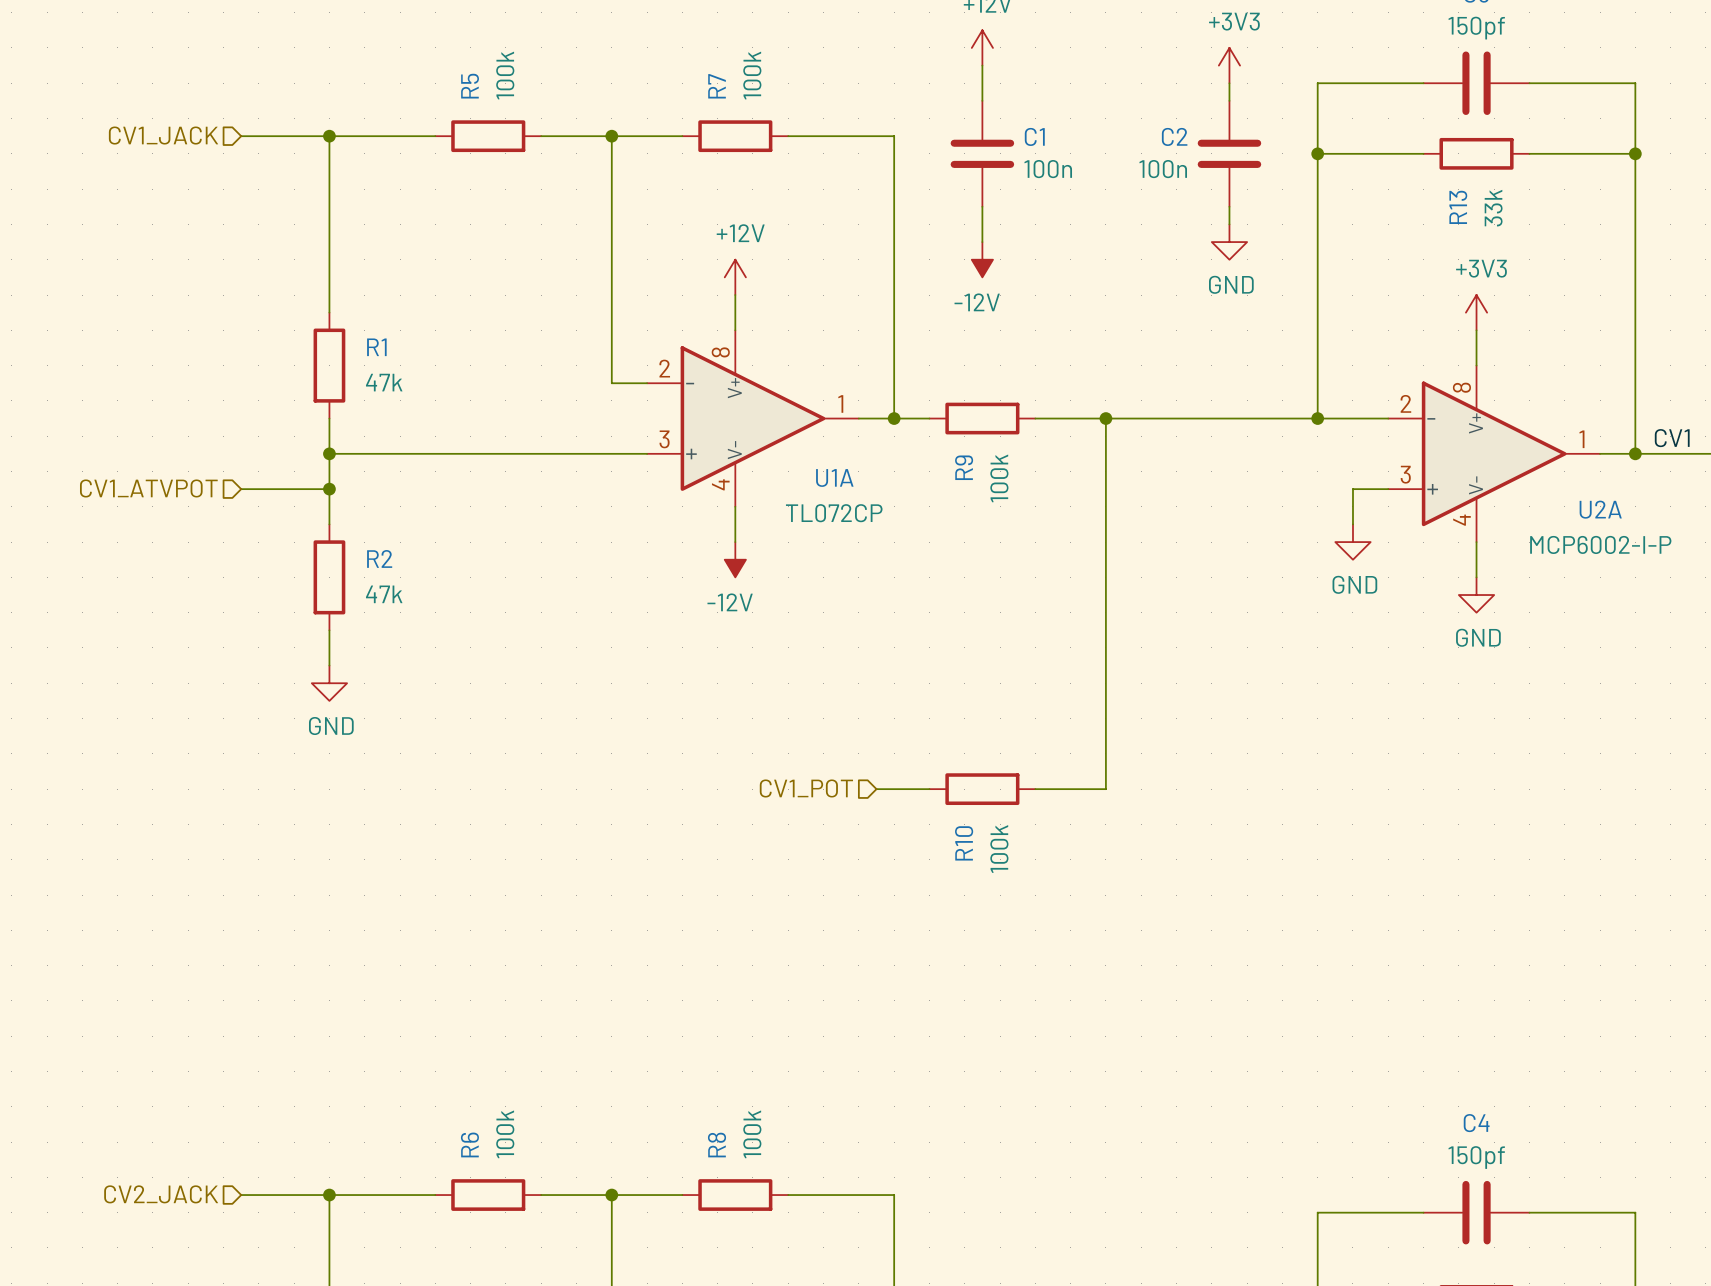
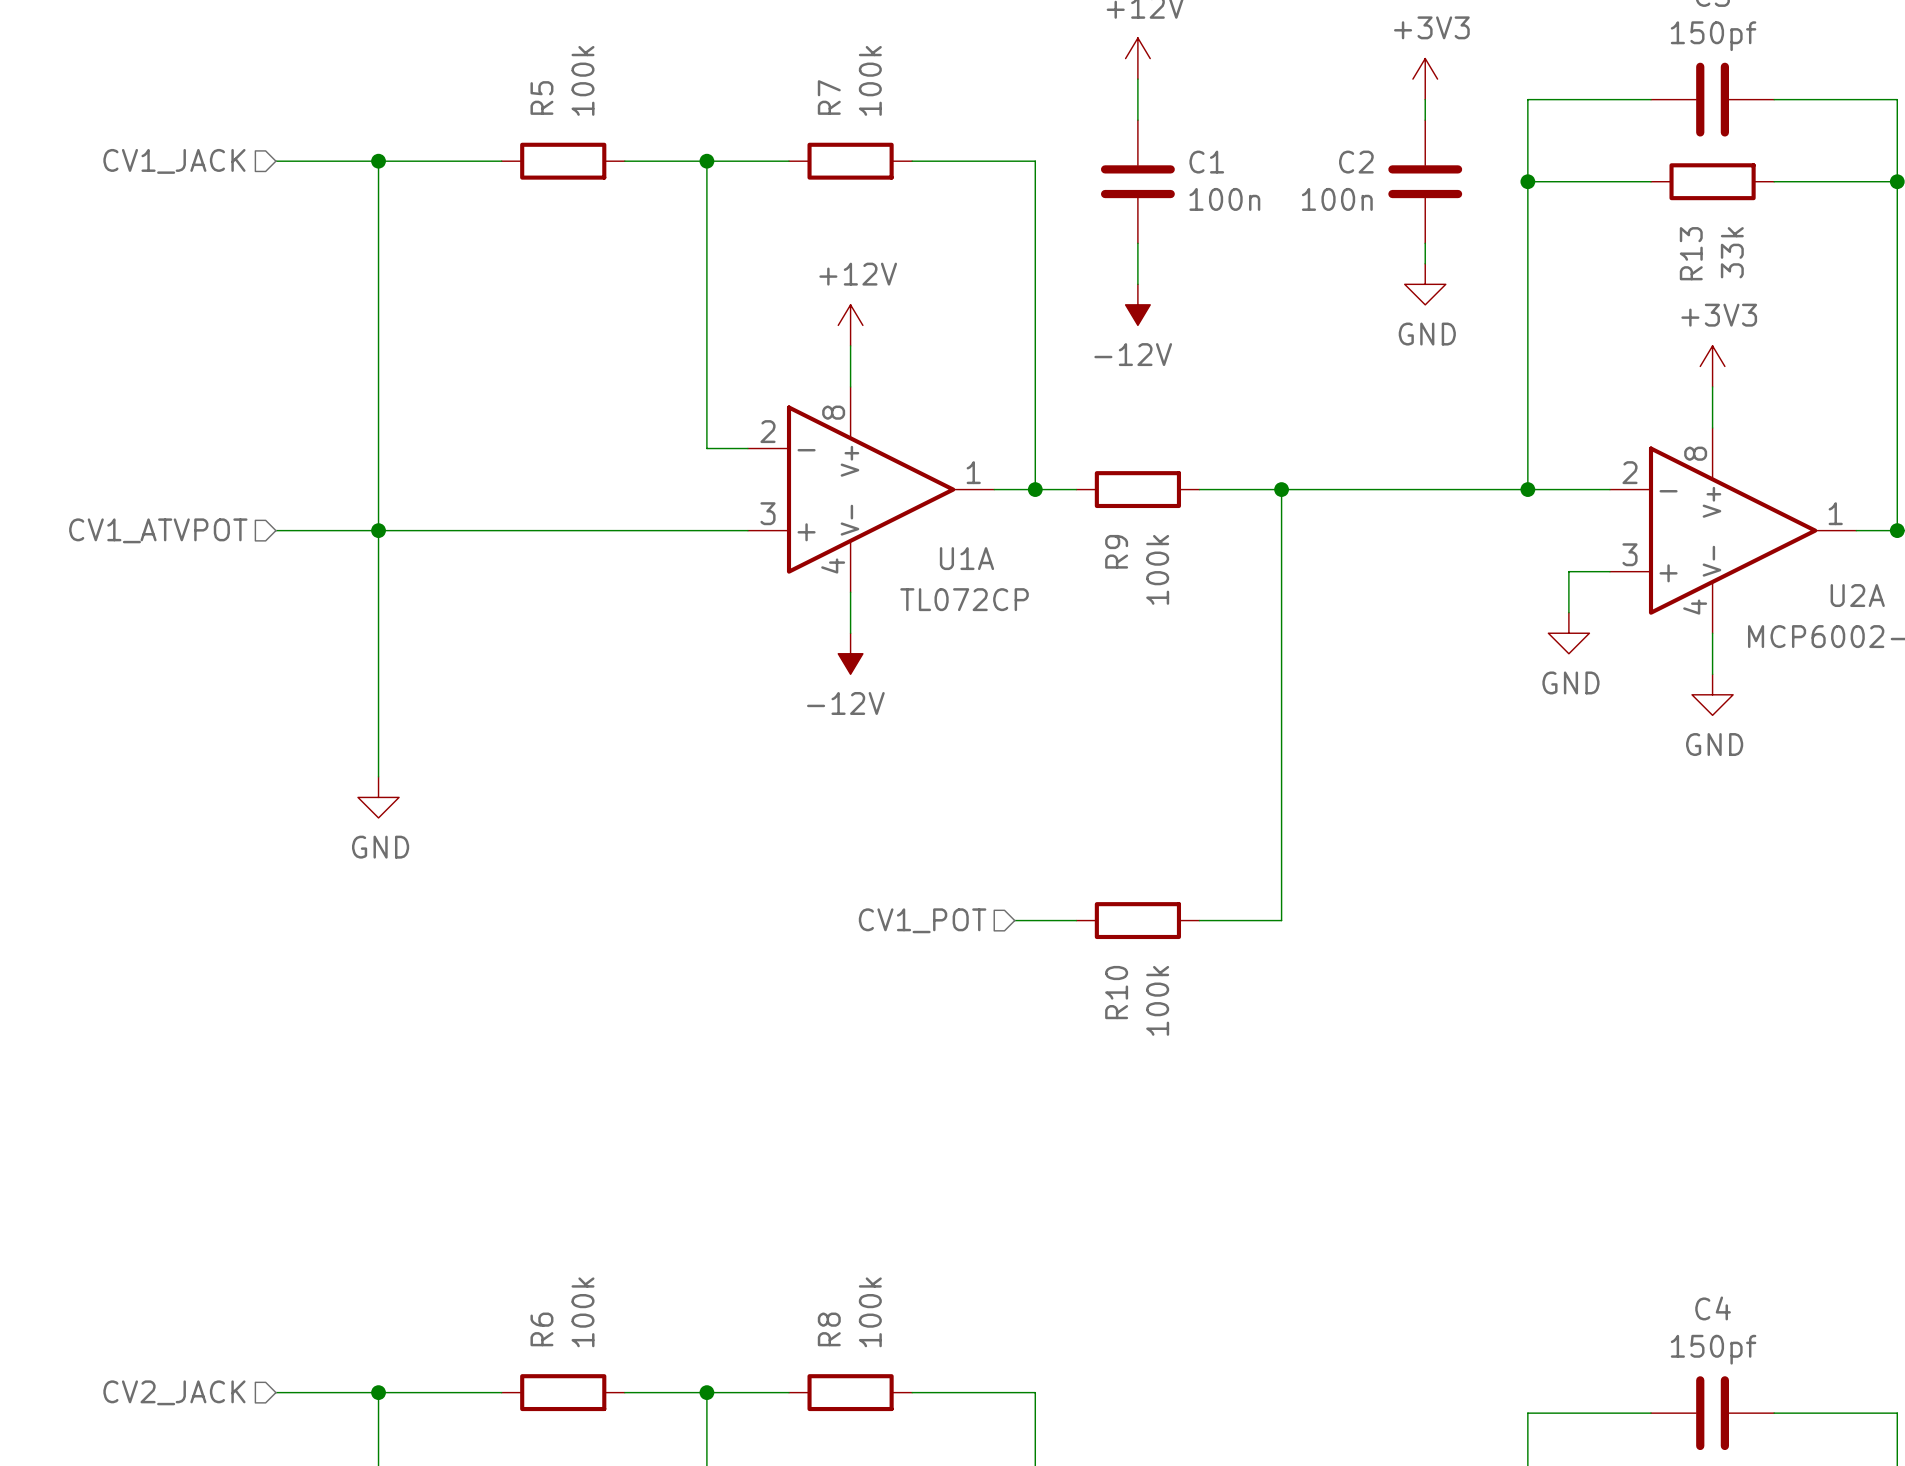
wire: none -> (378, 366) (378, 489)
R1: 47k (329, 365) -> none
hierarchical label position: CV1_ATVPOT (148, 488) -> CV1_ATVPOT (158, 530)
wire: (241, 489) (329, 489) -> (275, 530) (378, 530)
junction: (329, 489) -> none
wire: none -> (378, 612) (378, 735)
R2: 47k (329, 577) -> none

